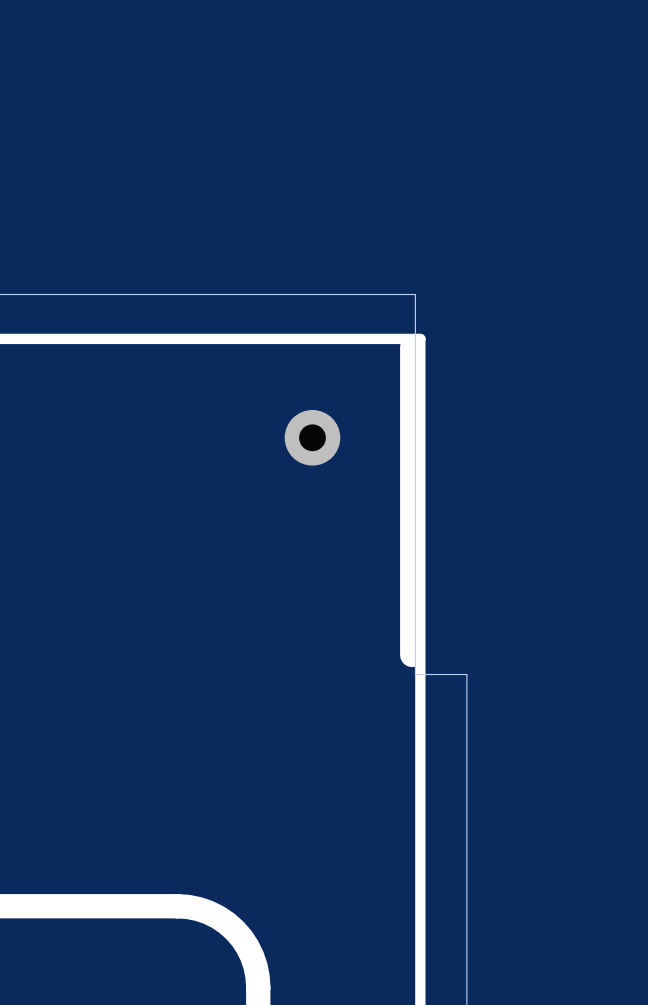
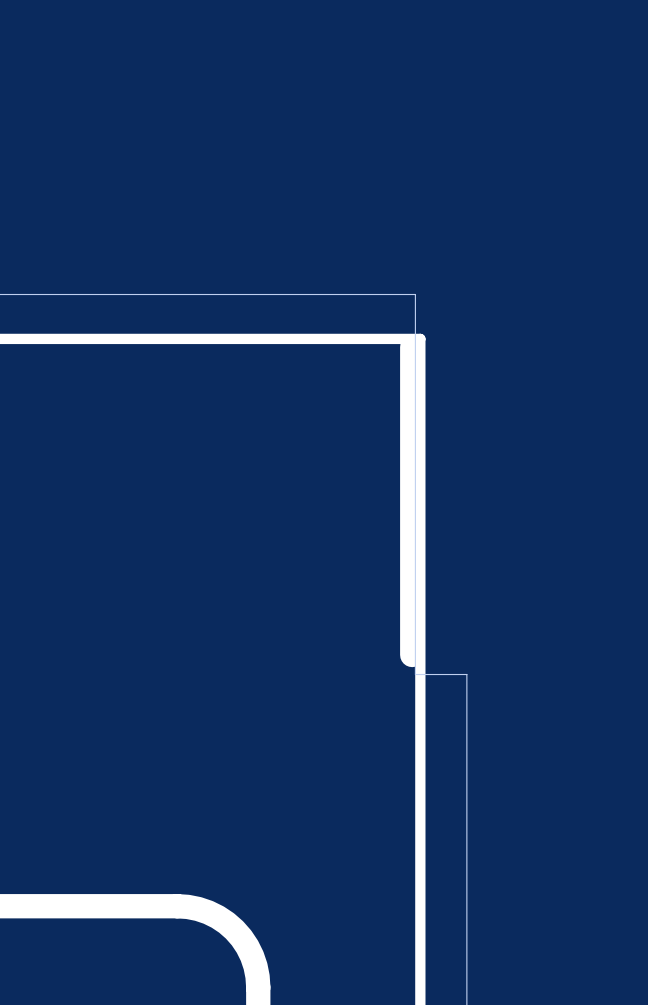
via: (312, 437) -> none

